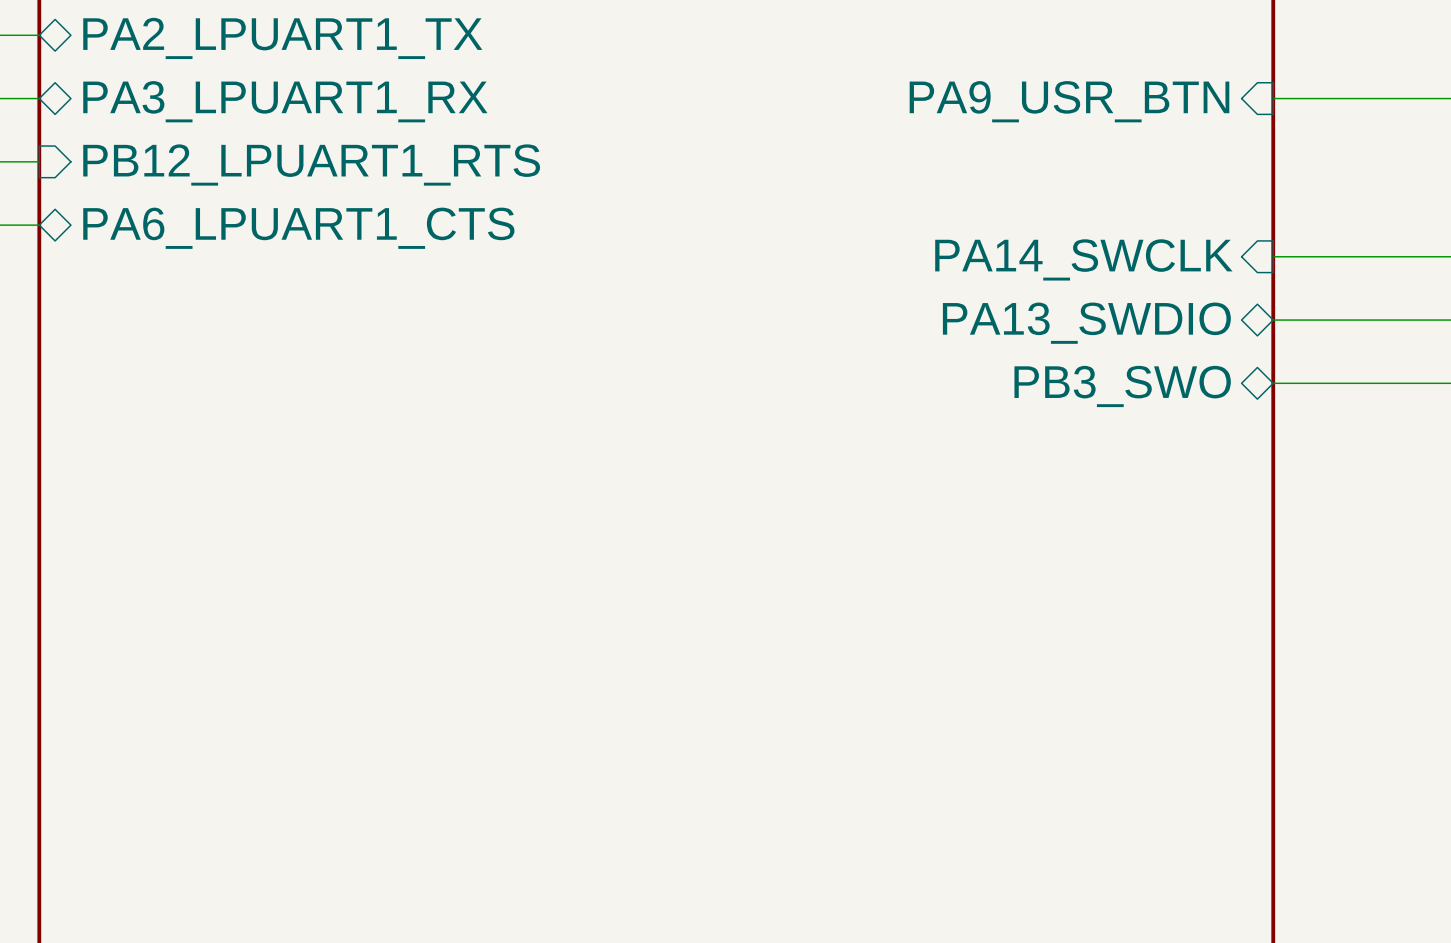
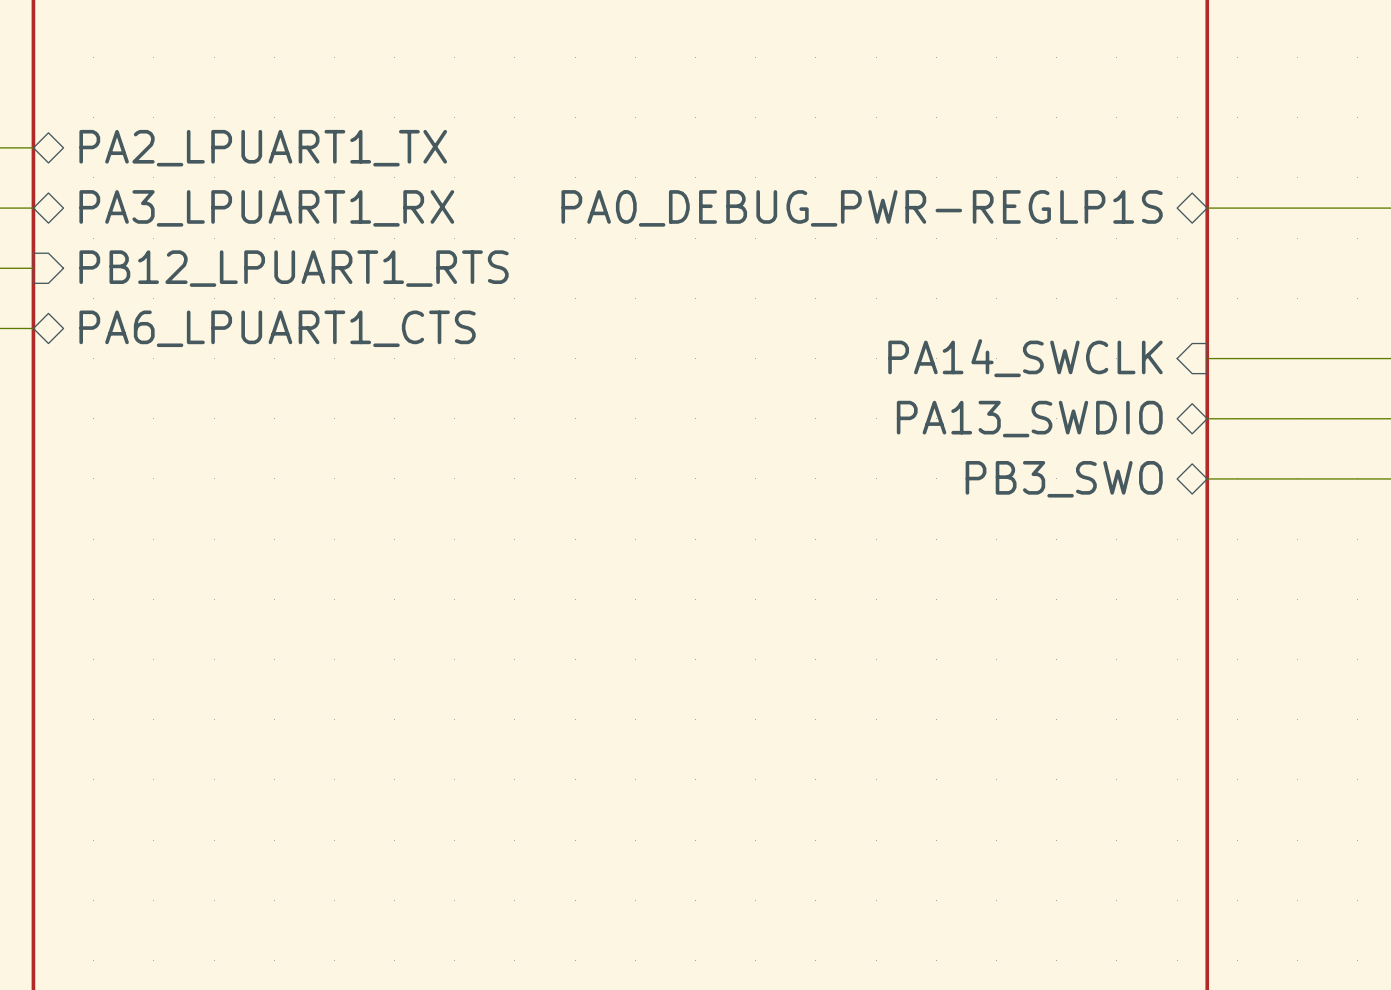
sheet pin shape: input (1069, 101) -> bidirectional (862, 208)
sheet pin: PA9_USR_BTN (1069, 101) -> PA0_DEBUG_PWR-REGLP1S (862, 208)

